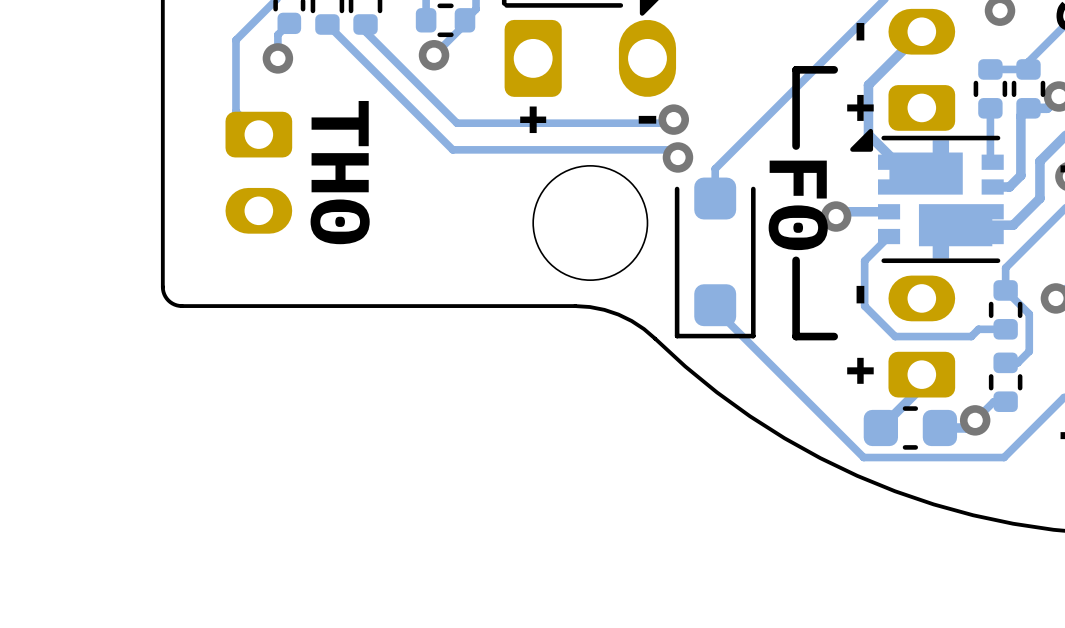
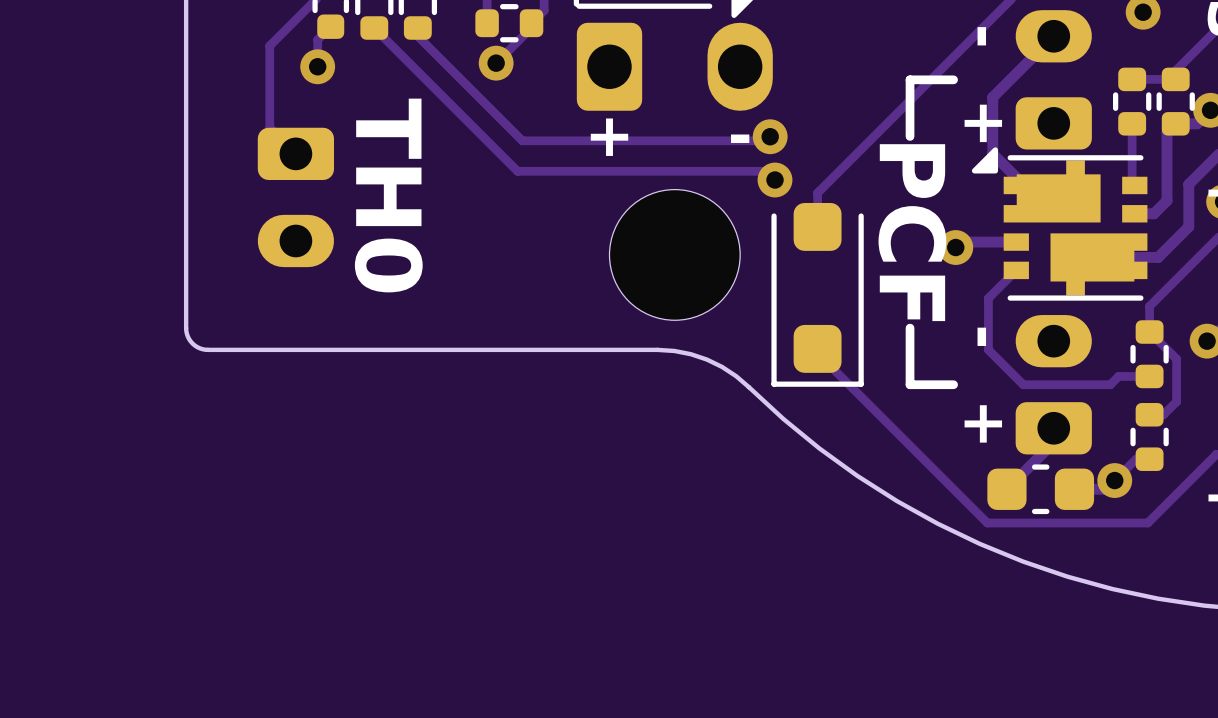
line: (796, 119) (796, 146) -> none
text: F0 (798, 205) -> PCF (912, 232)
line: (796, 260) (796, 287) -> none

